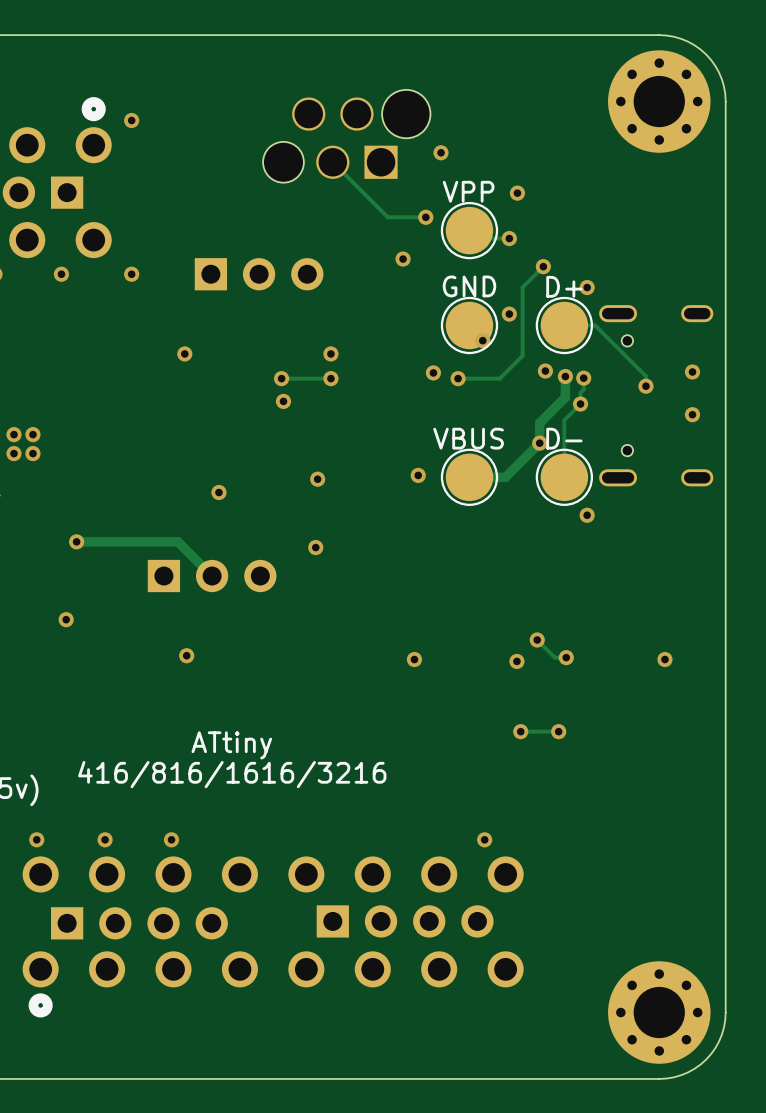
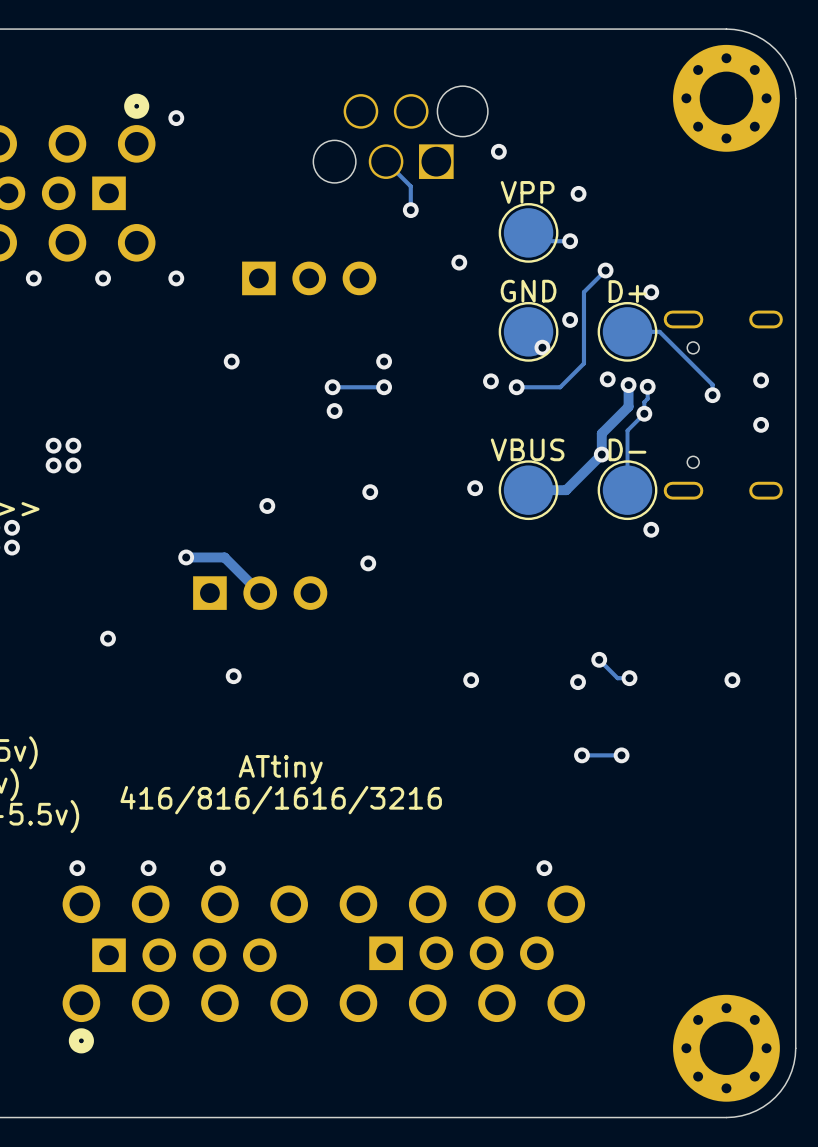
track: (356, 185) (387, 217) (425, 217) -> (410, 186) (410, 210)
via position: (425, 217) -> (410, 210)
via position: (76, 541) -> (186, 557)
track: (141, 541) (76, 541) -> none

